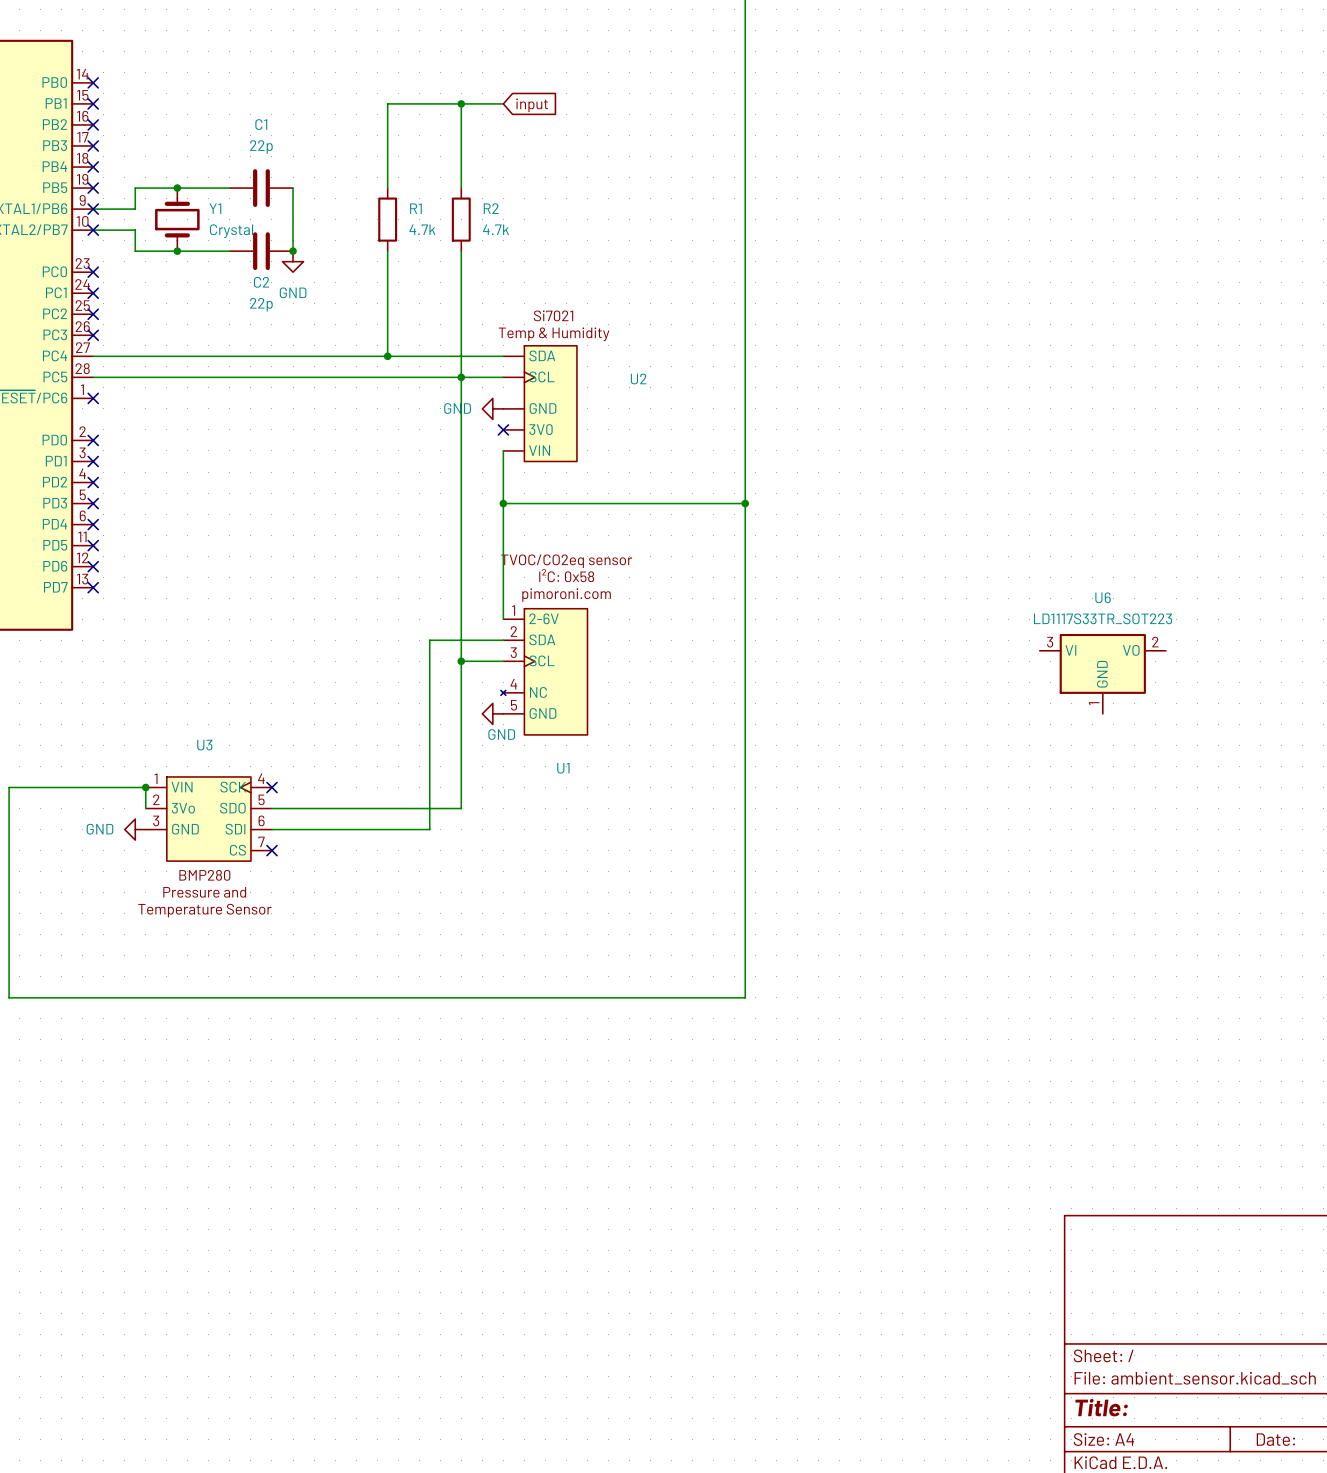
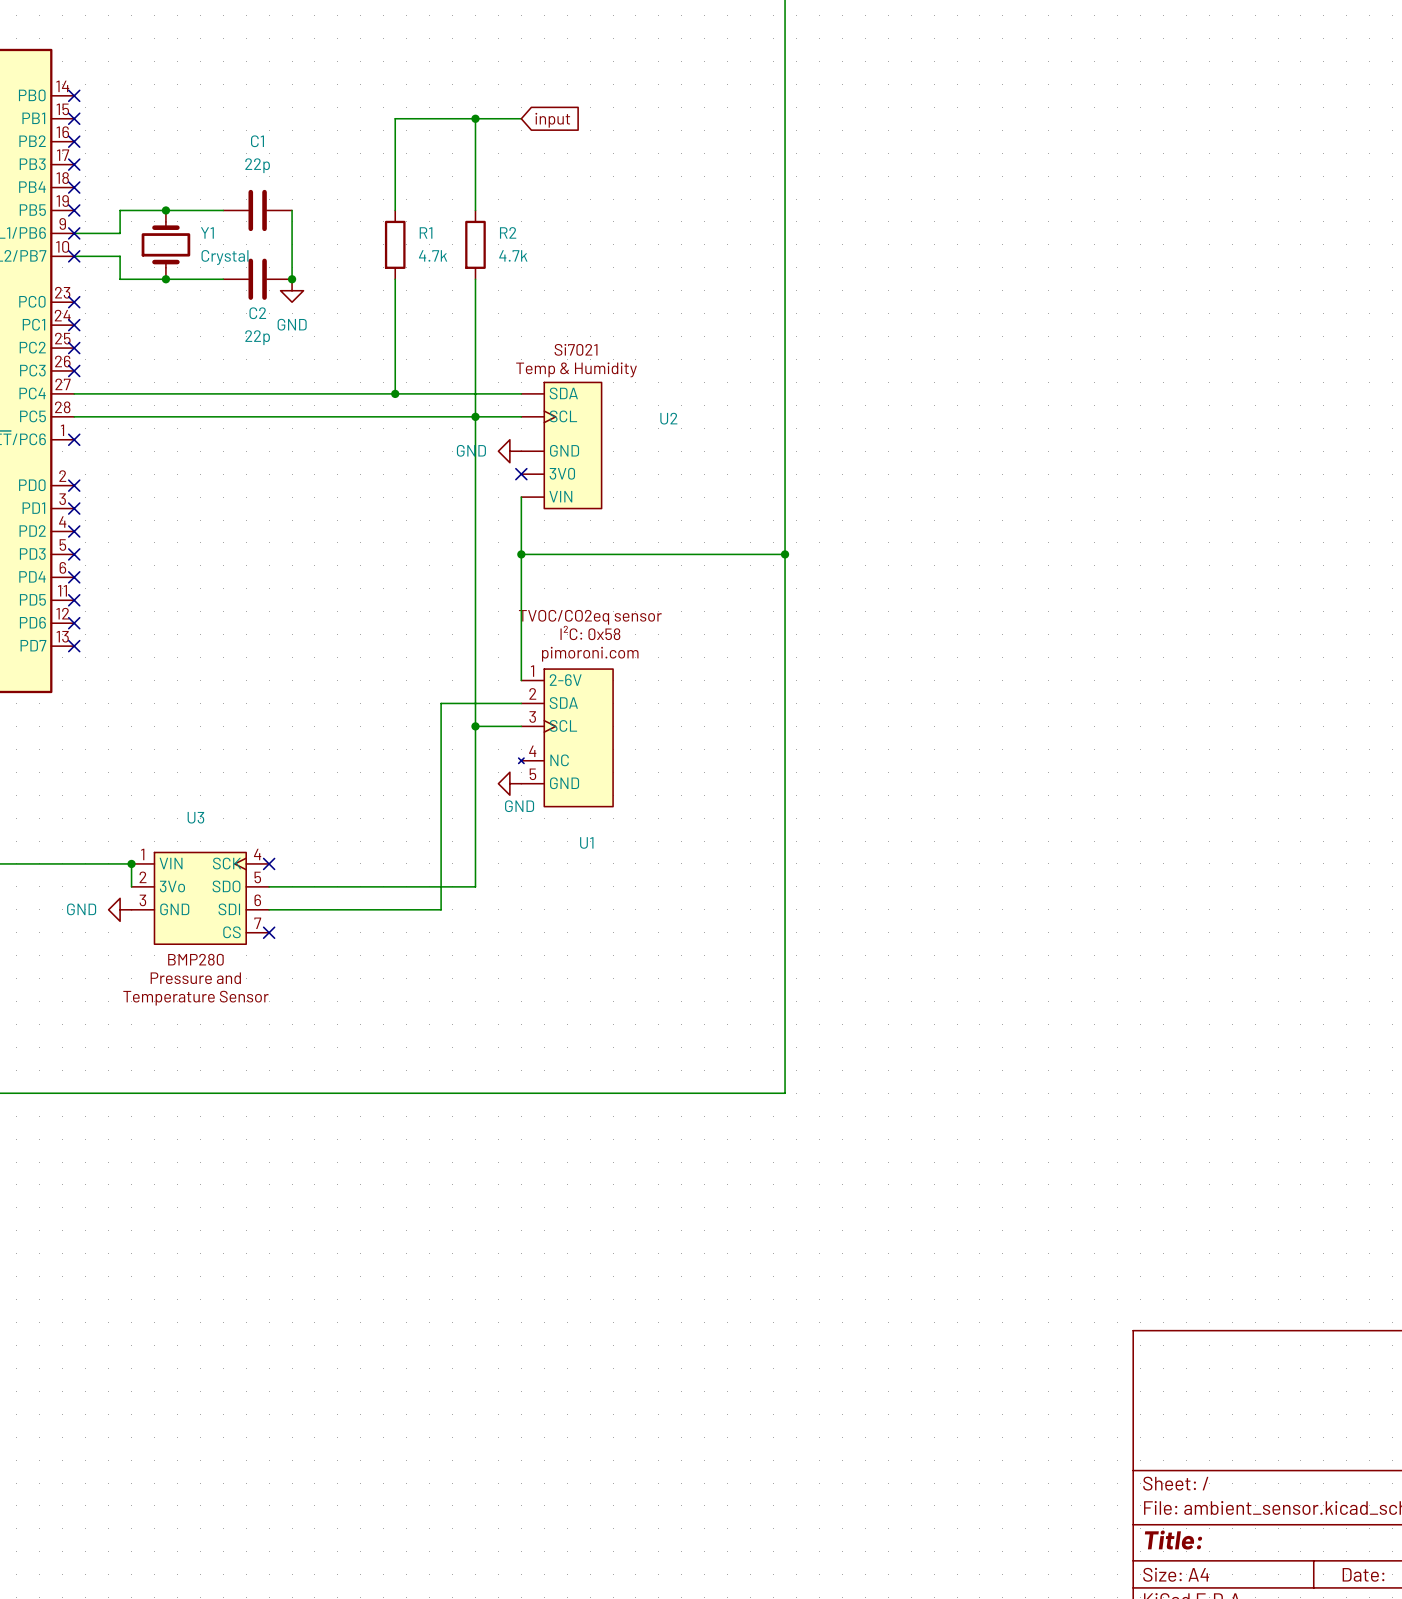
U6: LD1117S33TR_SOT223 (1102, 673) -> none

